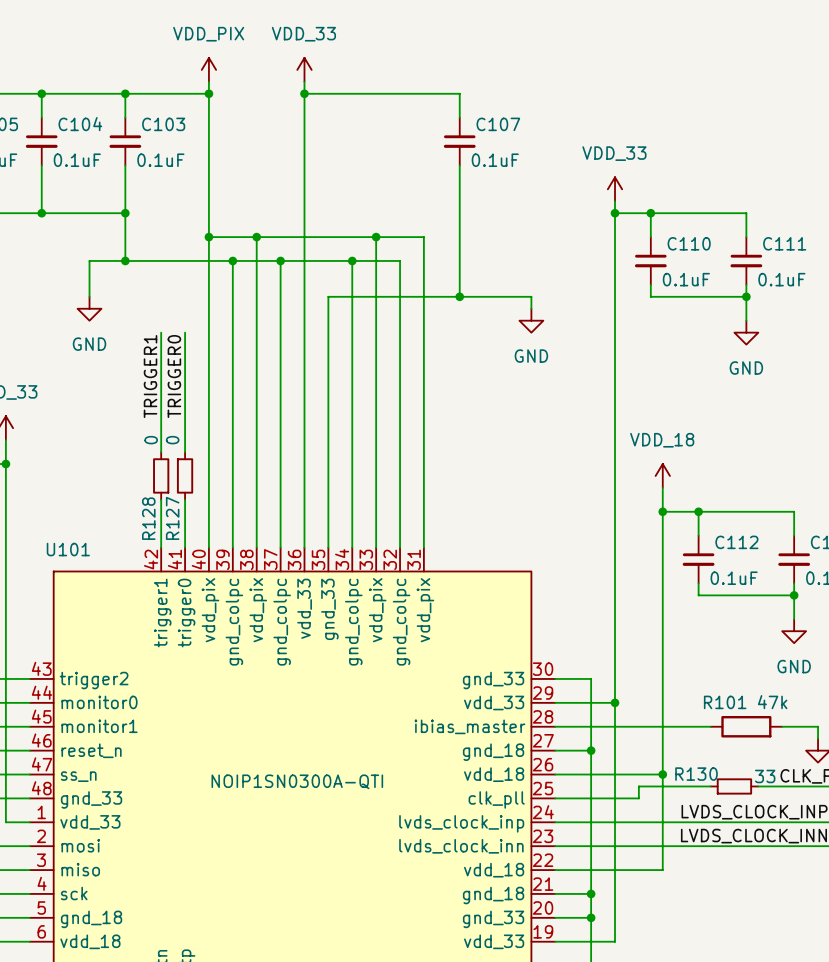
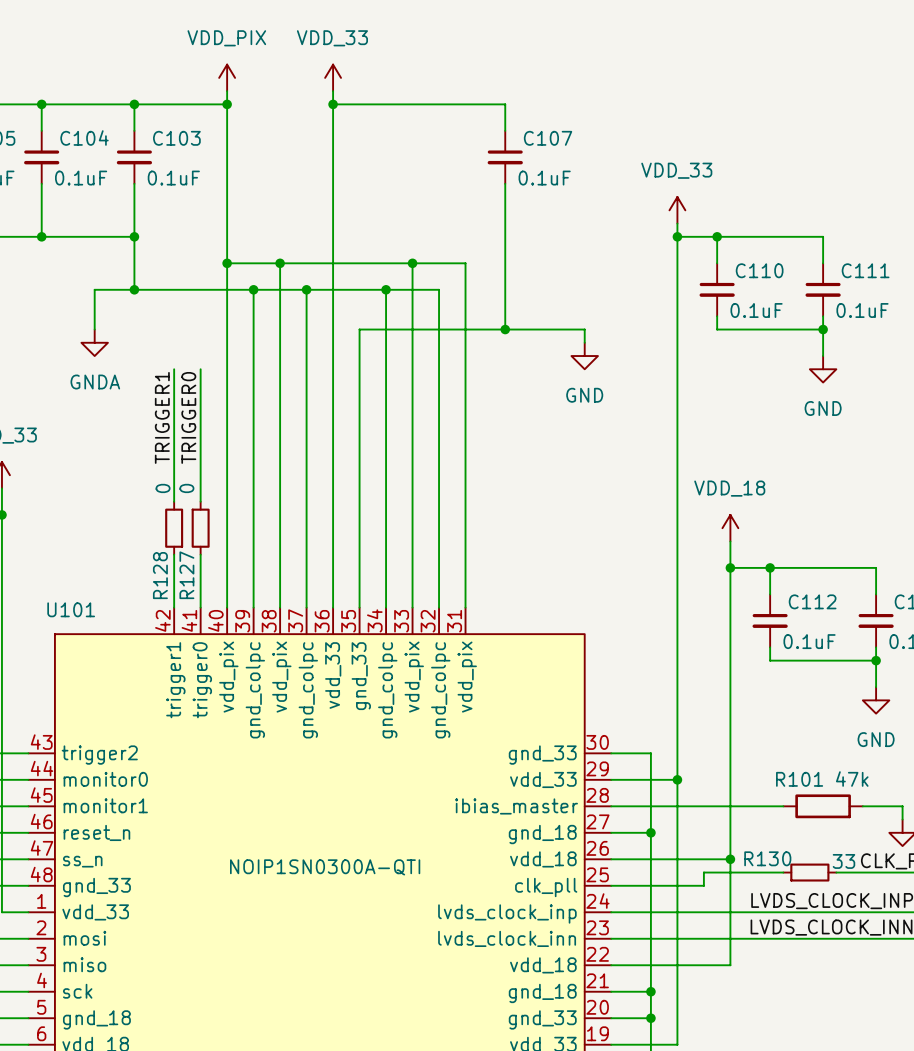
power symbol: GND (89, 308) -> GNDA (94, 342)

